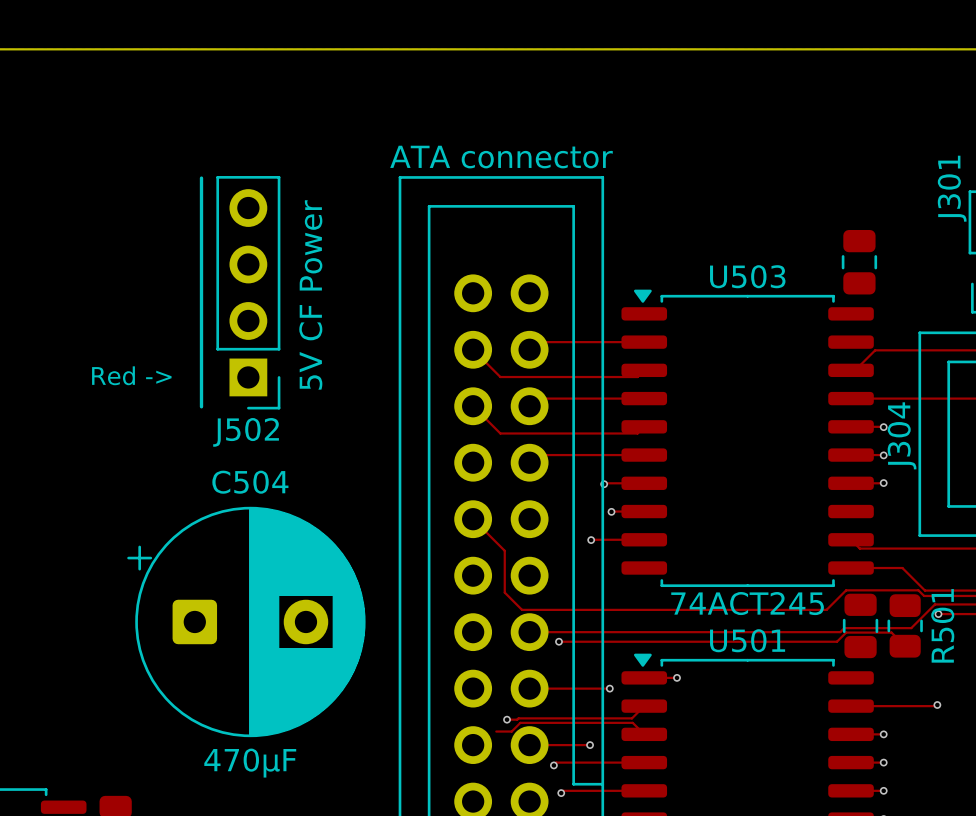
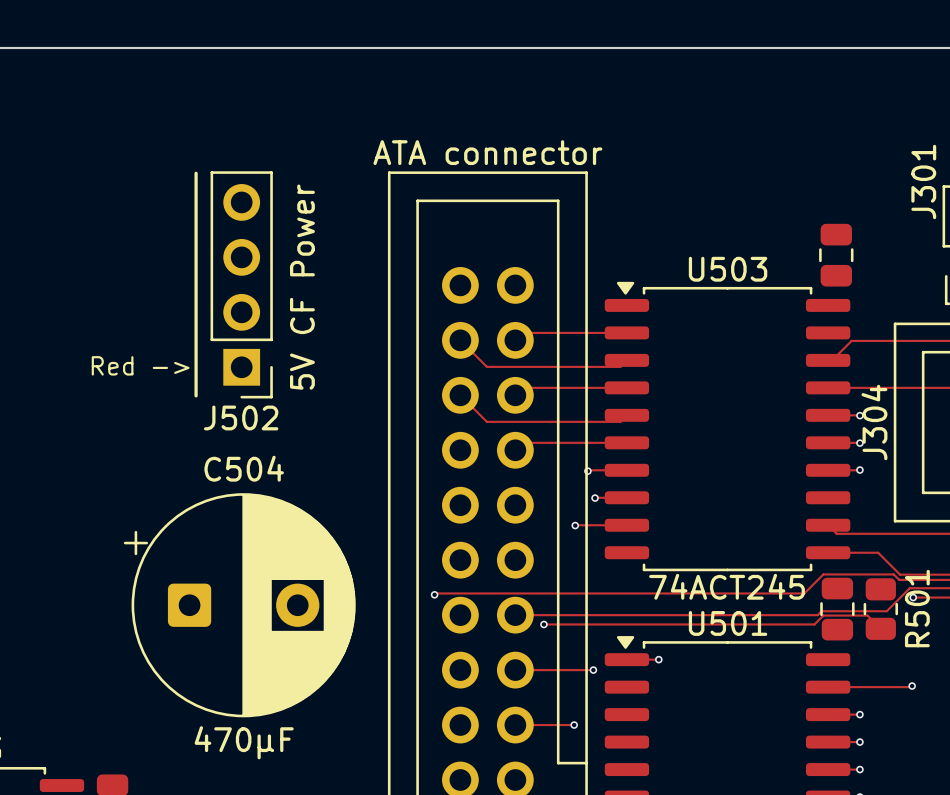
track: (473, 519) (504, 550) (504, 592) (522, 609) -> (434, 594) (508, 593)
via: none -> (434, 594)
track: (644, 706) (631, 718) (507, 719) -> none
via: (507, 719) -> none
track: (496, 731) (511, 731) (520, 722) (632, 722) (644, 734) -> none
track: (644, 762) (556, 762) (553, 765) -> none
via: (553, 765) -> none
track: (644, 790) (563, 790) (561, 793) -> none
via: (561, 793) -> none

